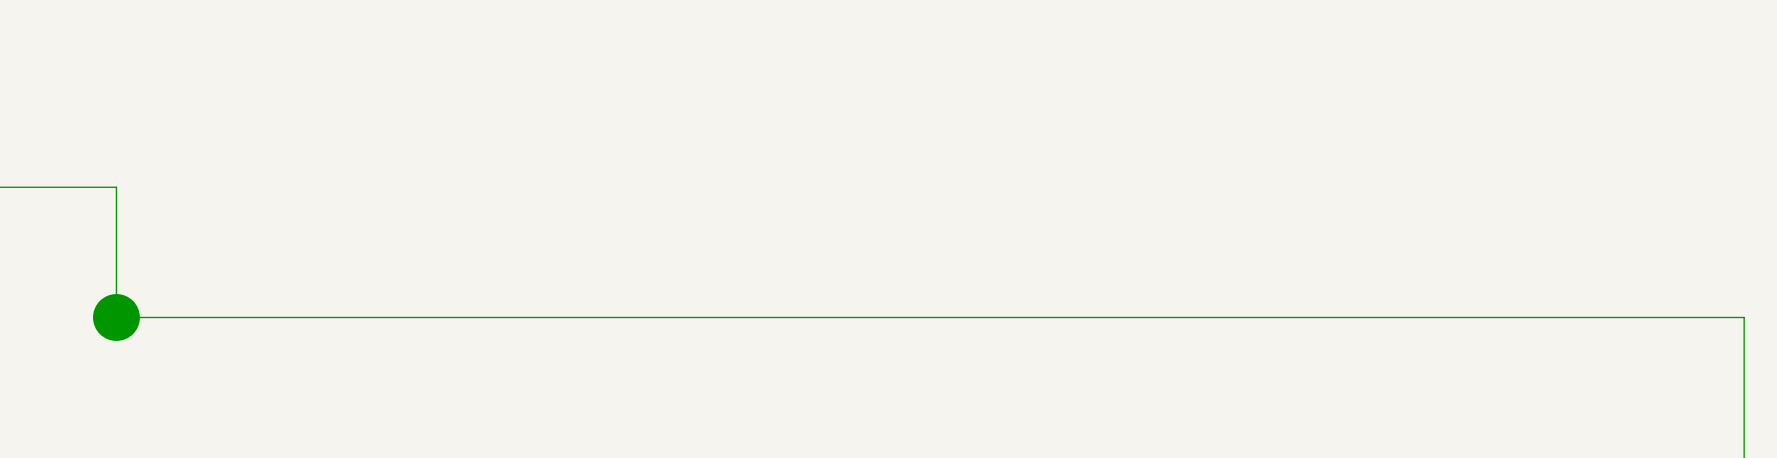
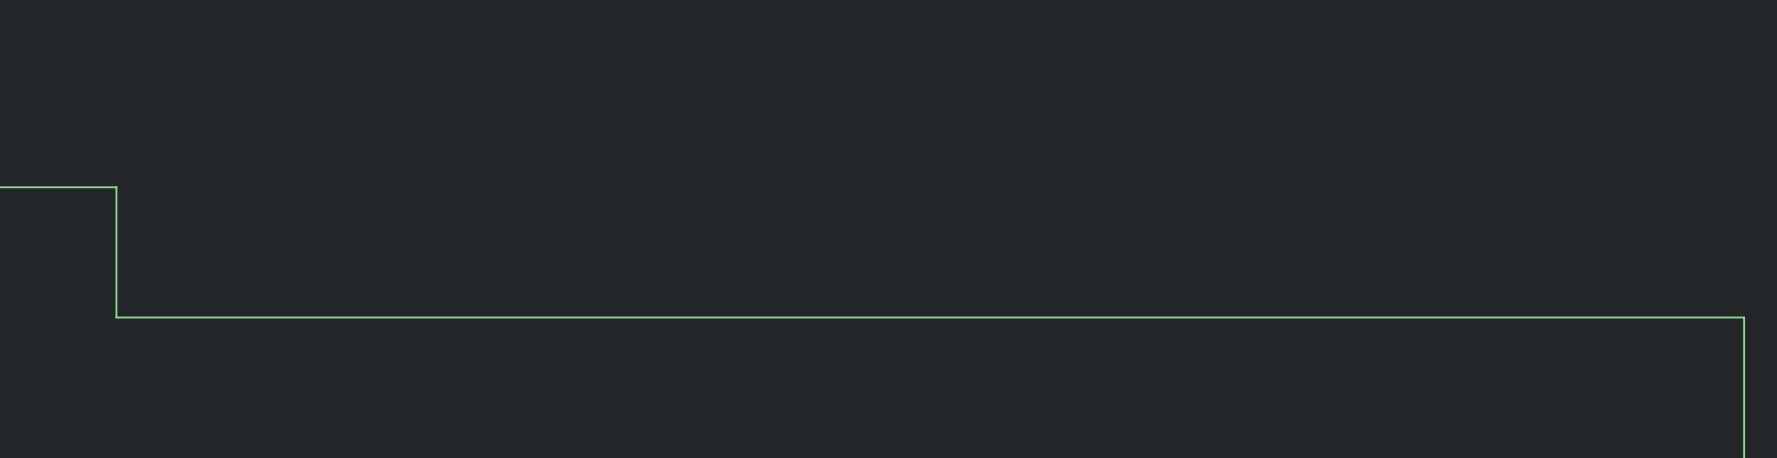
junction: (116, 317) -> none

